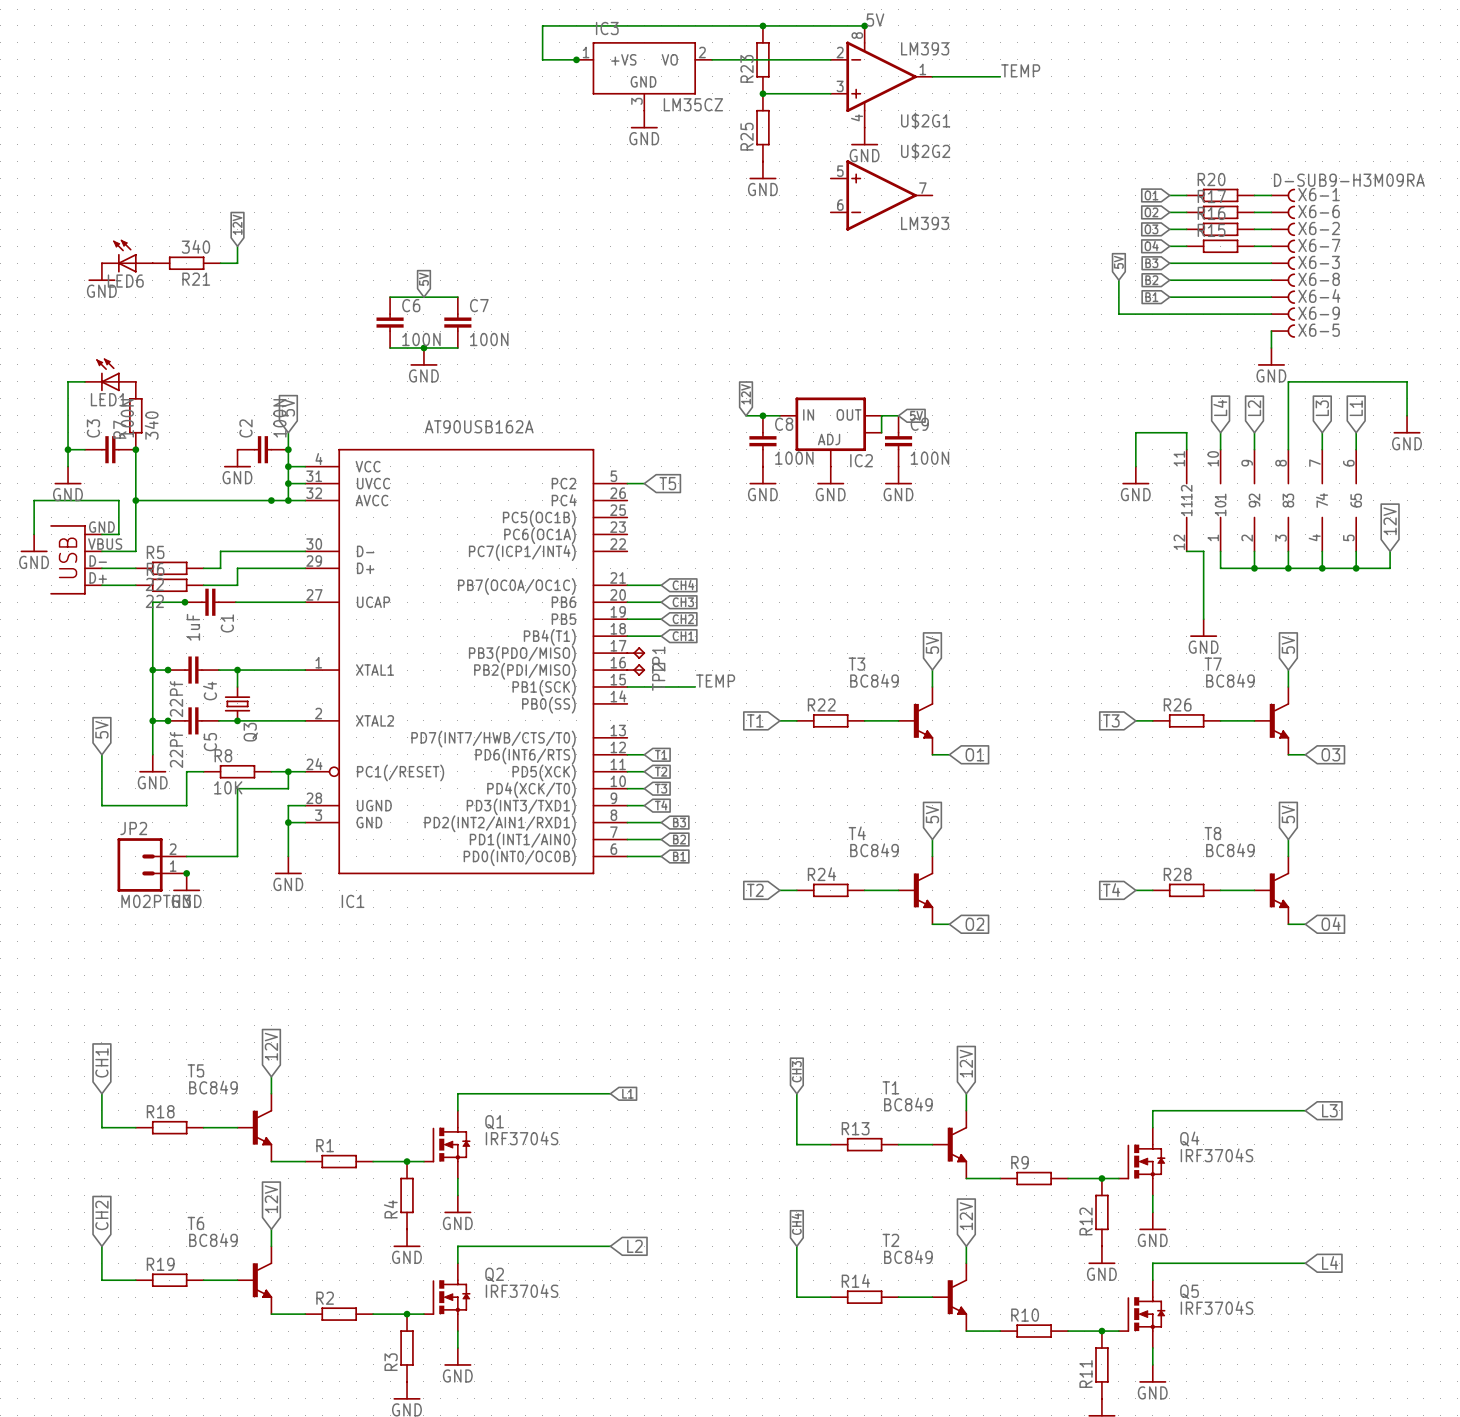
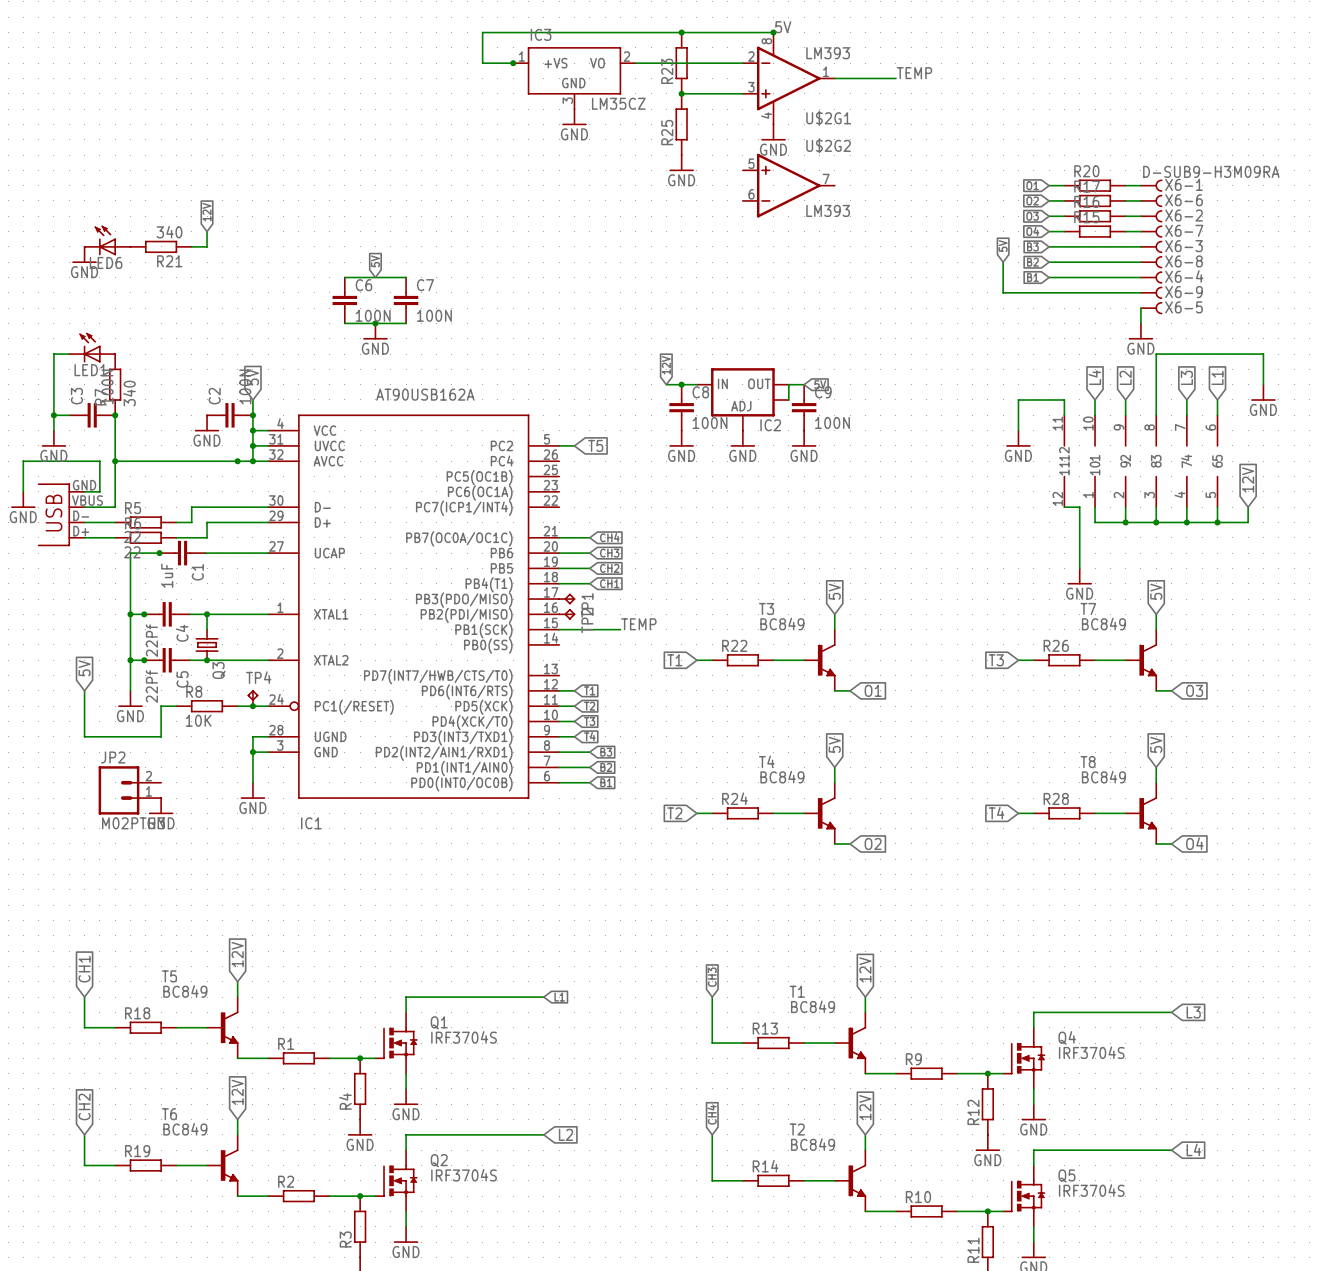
TP4: none -> (252, 698)
wire: (288, 771) (288, 788) (237, 788) (237, 856) (186, 856) -> none
junction: (186, 873) -> none

